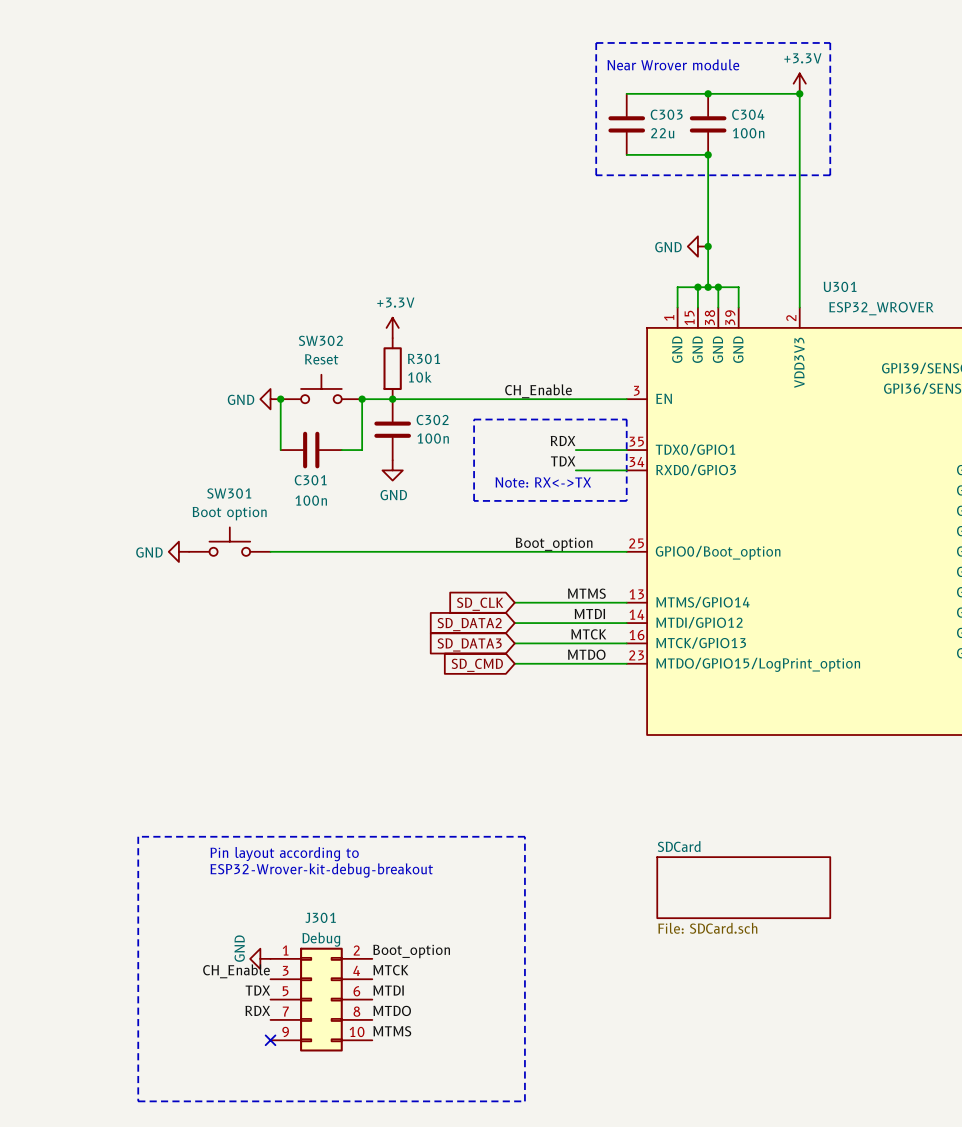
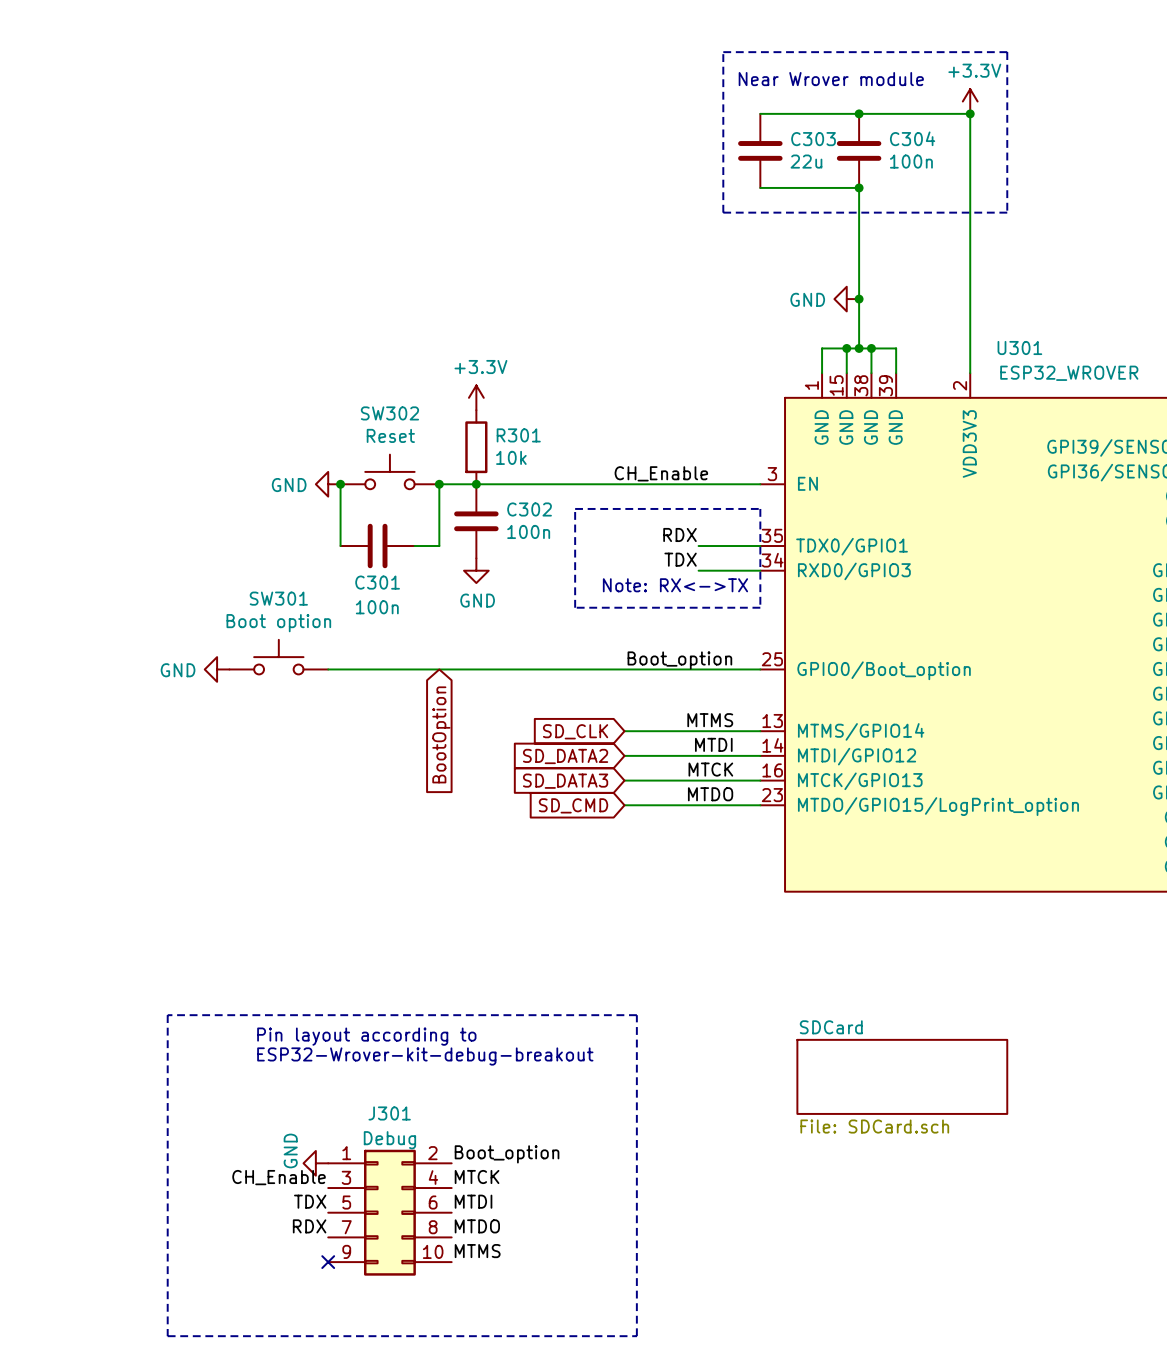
global label: none -> BootOption (441, 734)

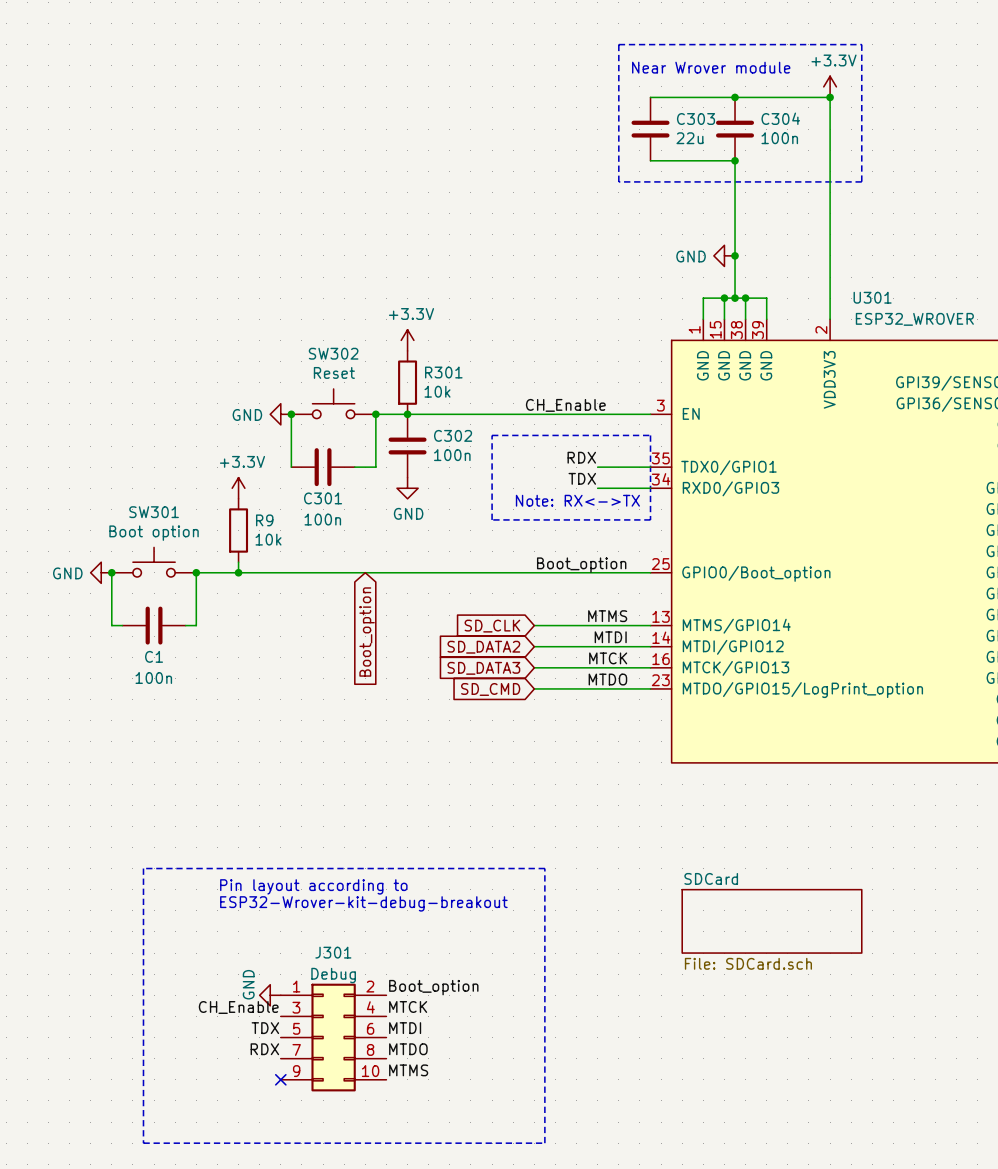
power symbol: none -> +3.3V (238, 488)
R9: none -> 10k (238, 530)
wire: none -> (238, 562) (238, 572)
SW301 position: (278, 657) -> (154, 562)
wire: none -> (111, 572) (111, 625) (122, 625)
junction: none -> (111, 572)
power symbol position: GND (217, 669) -> GND (101, 572)
junction: none -> (196, 572)
junction: none -> (238, 572)
wire: none -> (280, 572) (196, 572) (196, 625) (185, 625)
C1: none -> 100n (154, 625)
global label: BootOption (441, 734) -> Boot_option (367, 632)

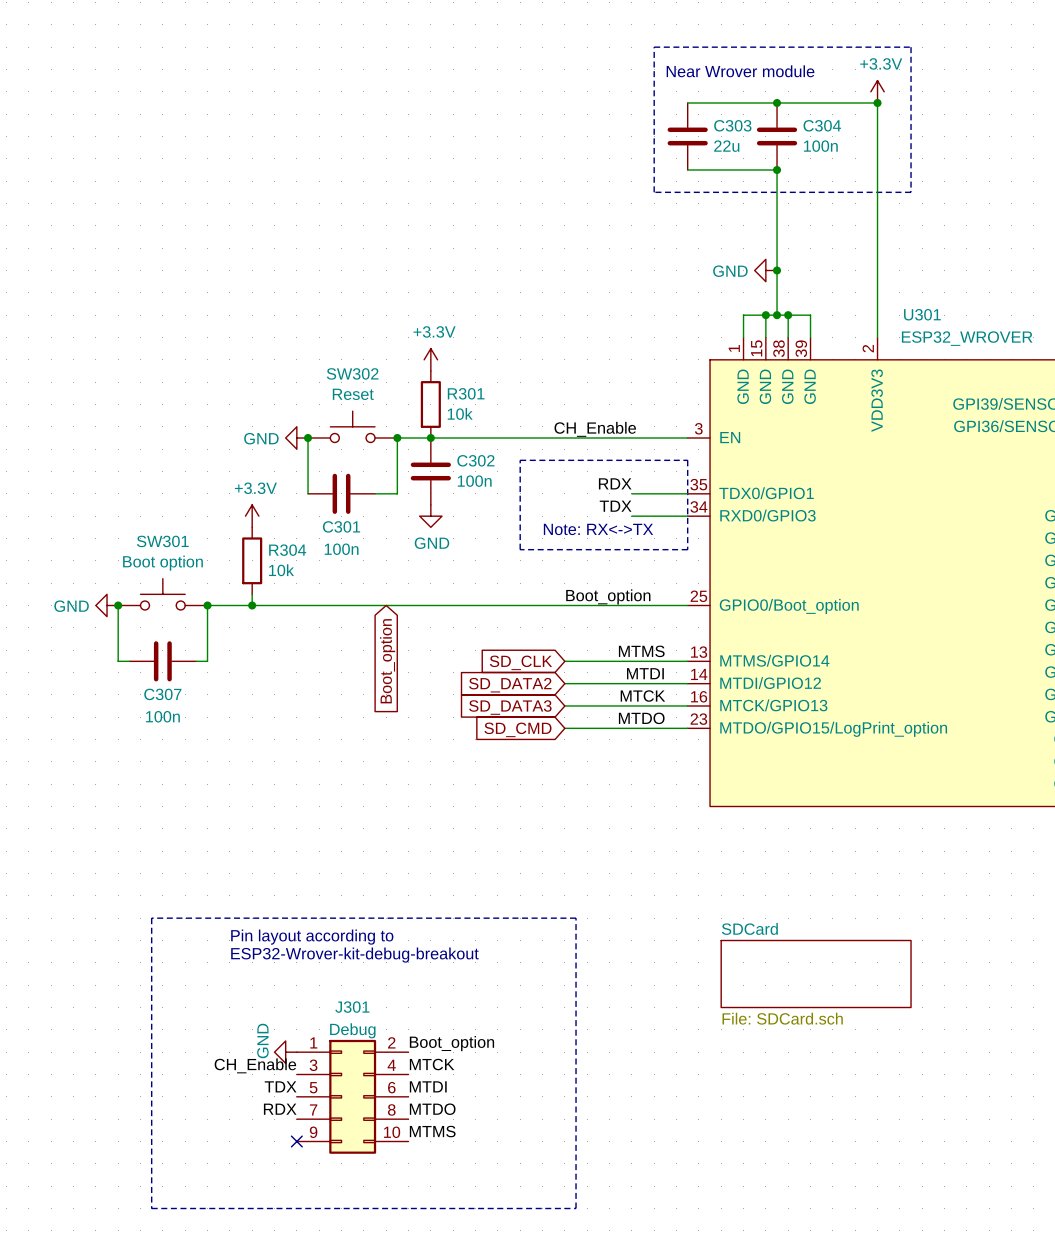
R9 name: R9 (264, 520) -> R304 (287, 550)
C1 name: C1 (154, 656) -> C307 (162, 694)

